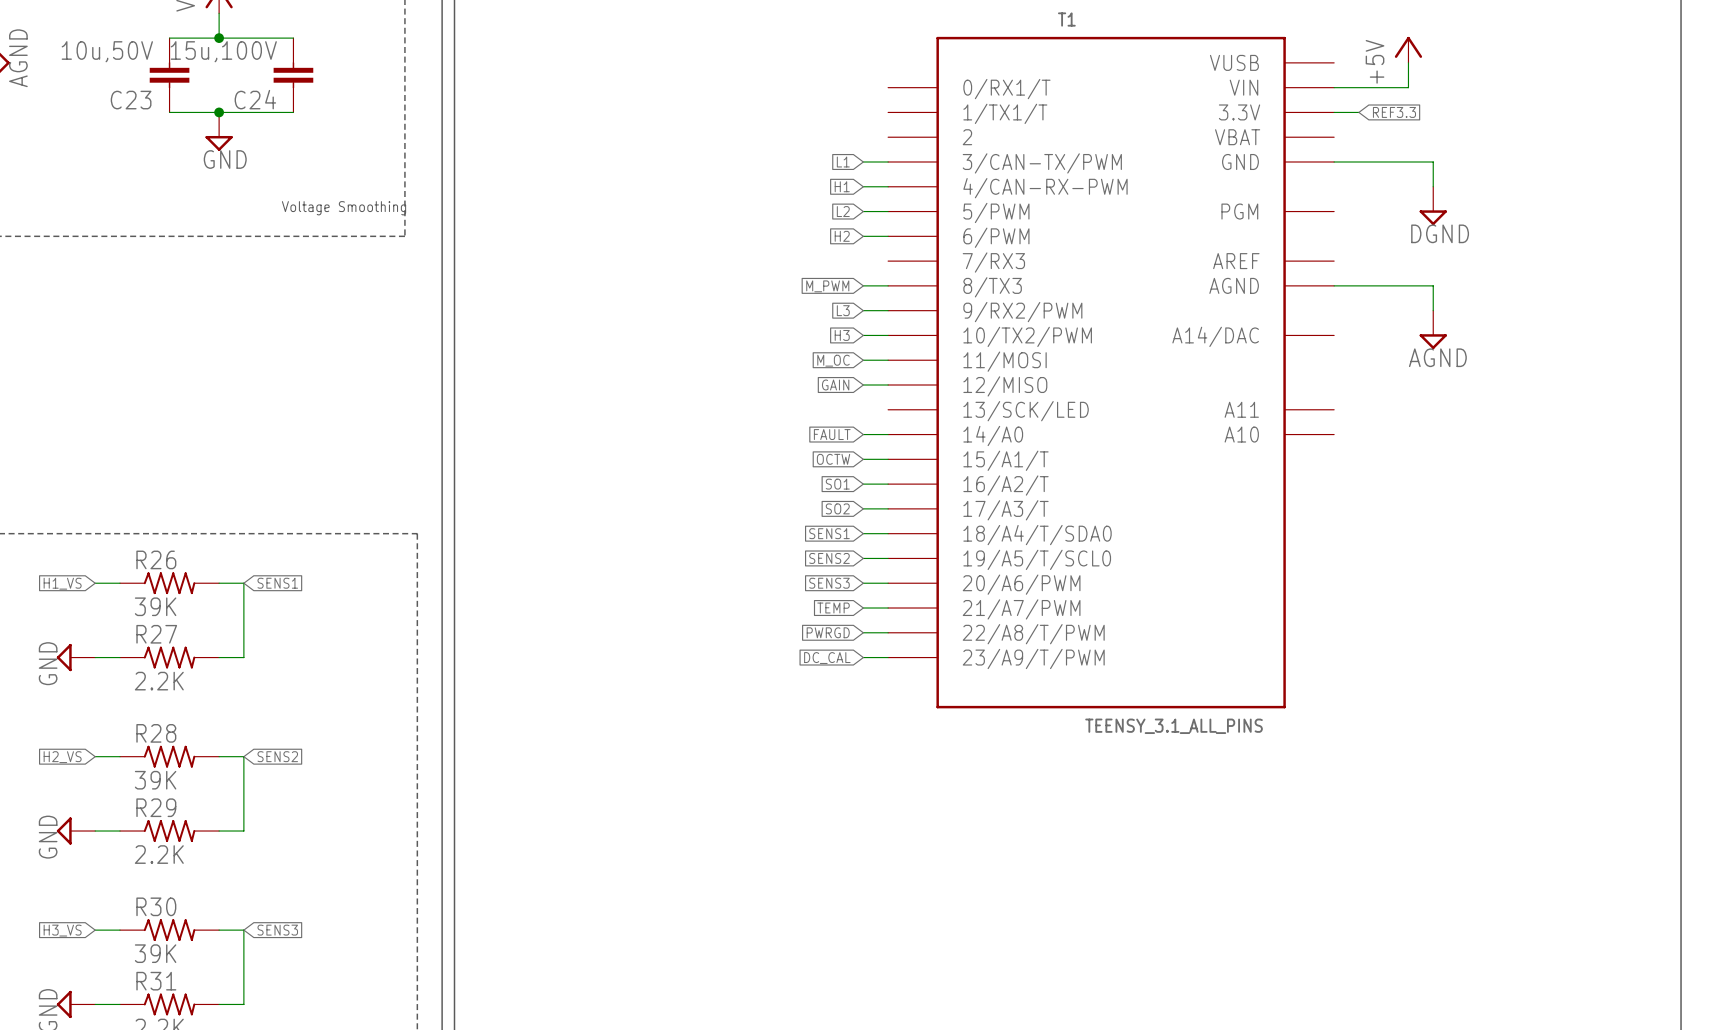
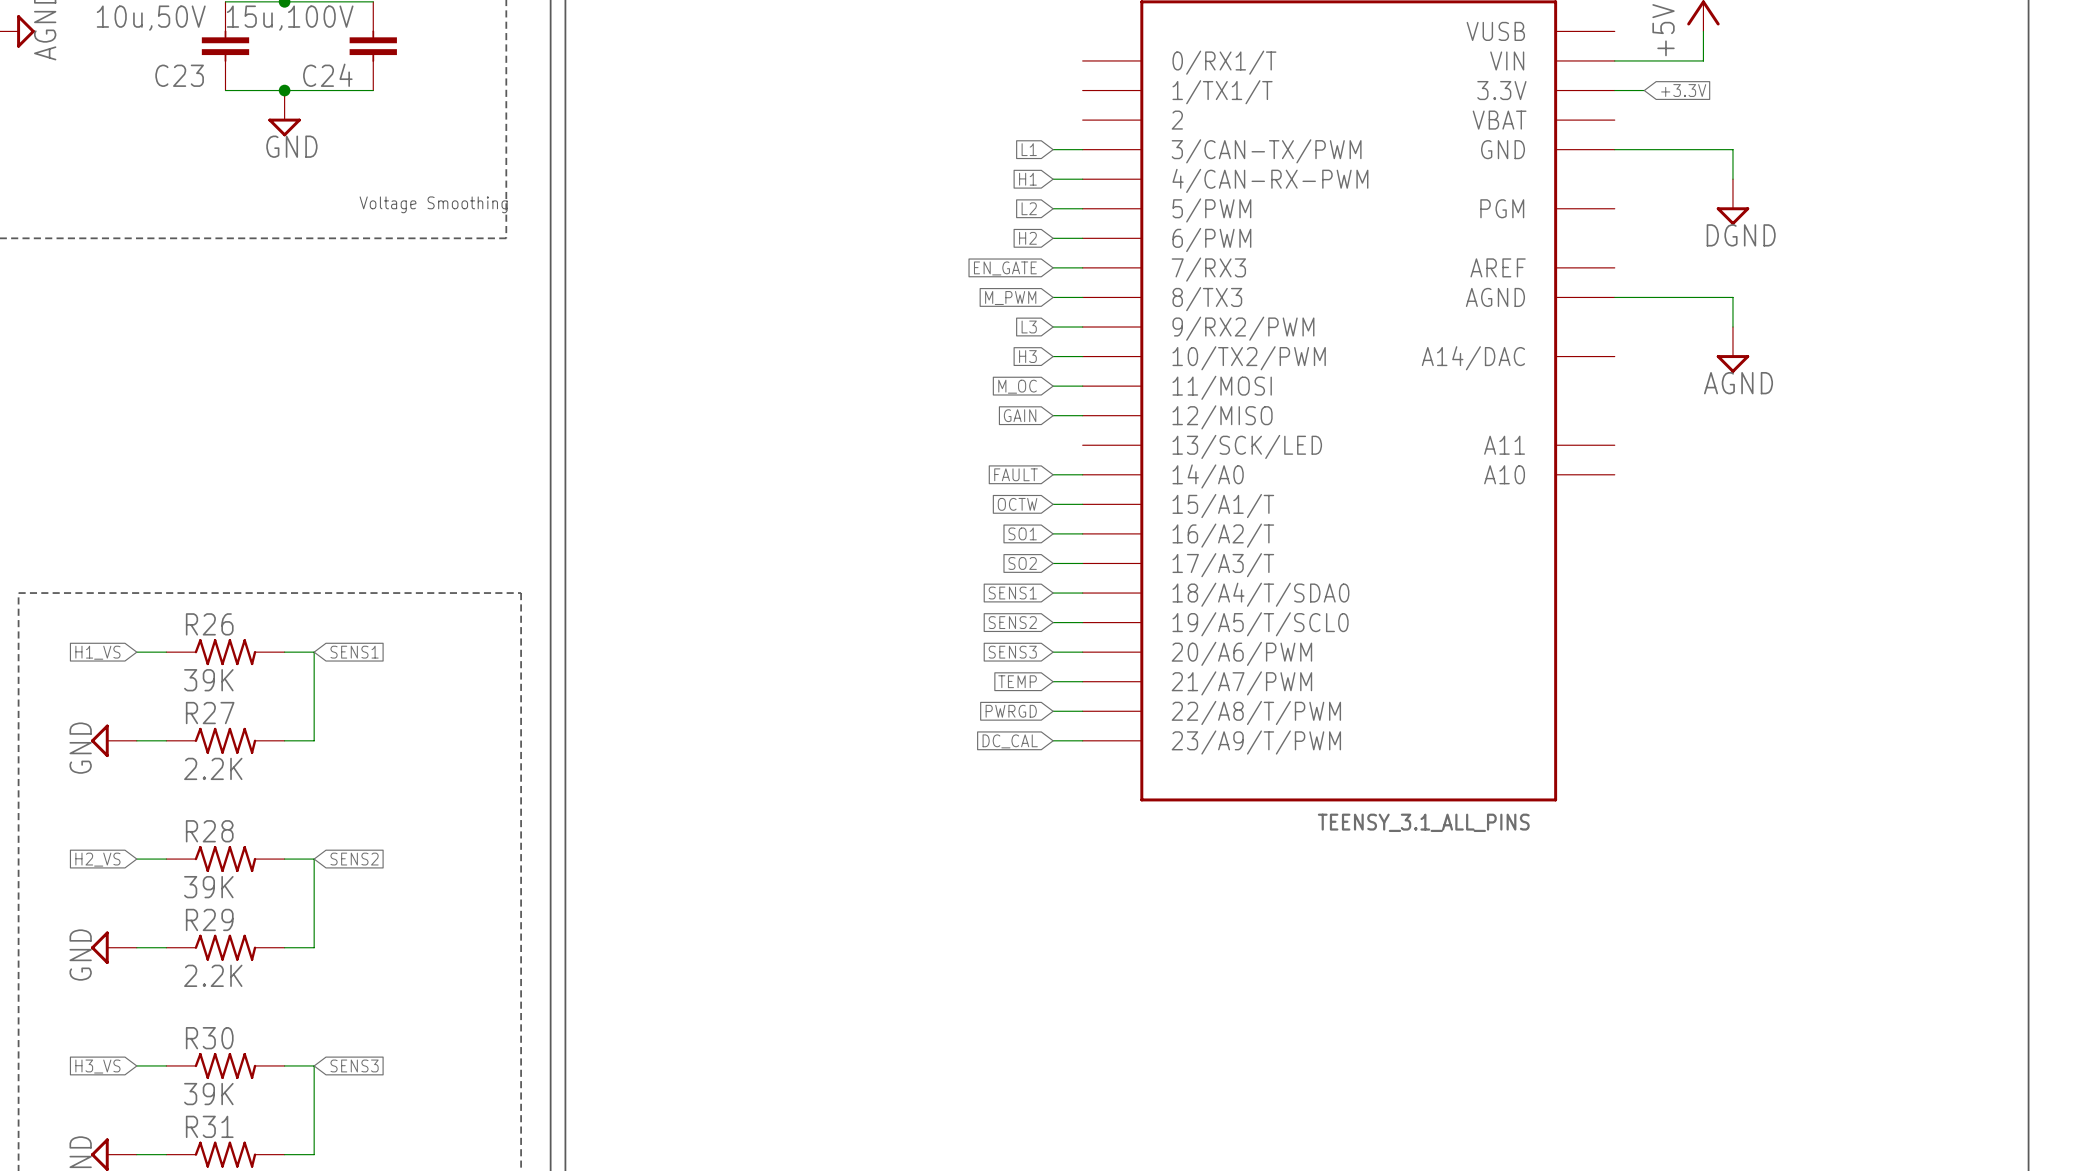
global label: REF3.3 (1394, 112) -> +3.3V (1683, 90)
global label: none -> EN_GATE (1005, 268)
wire: none -> (1053, 267) (1082, 267)

